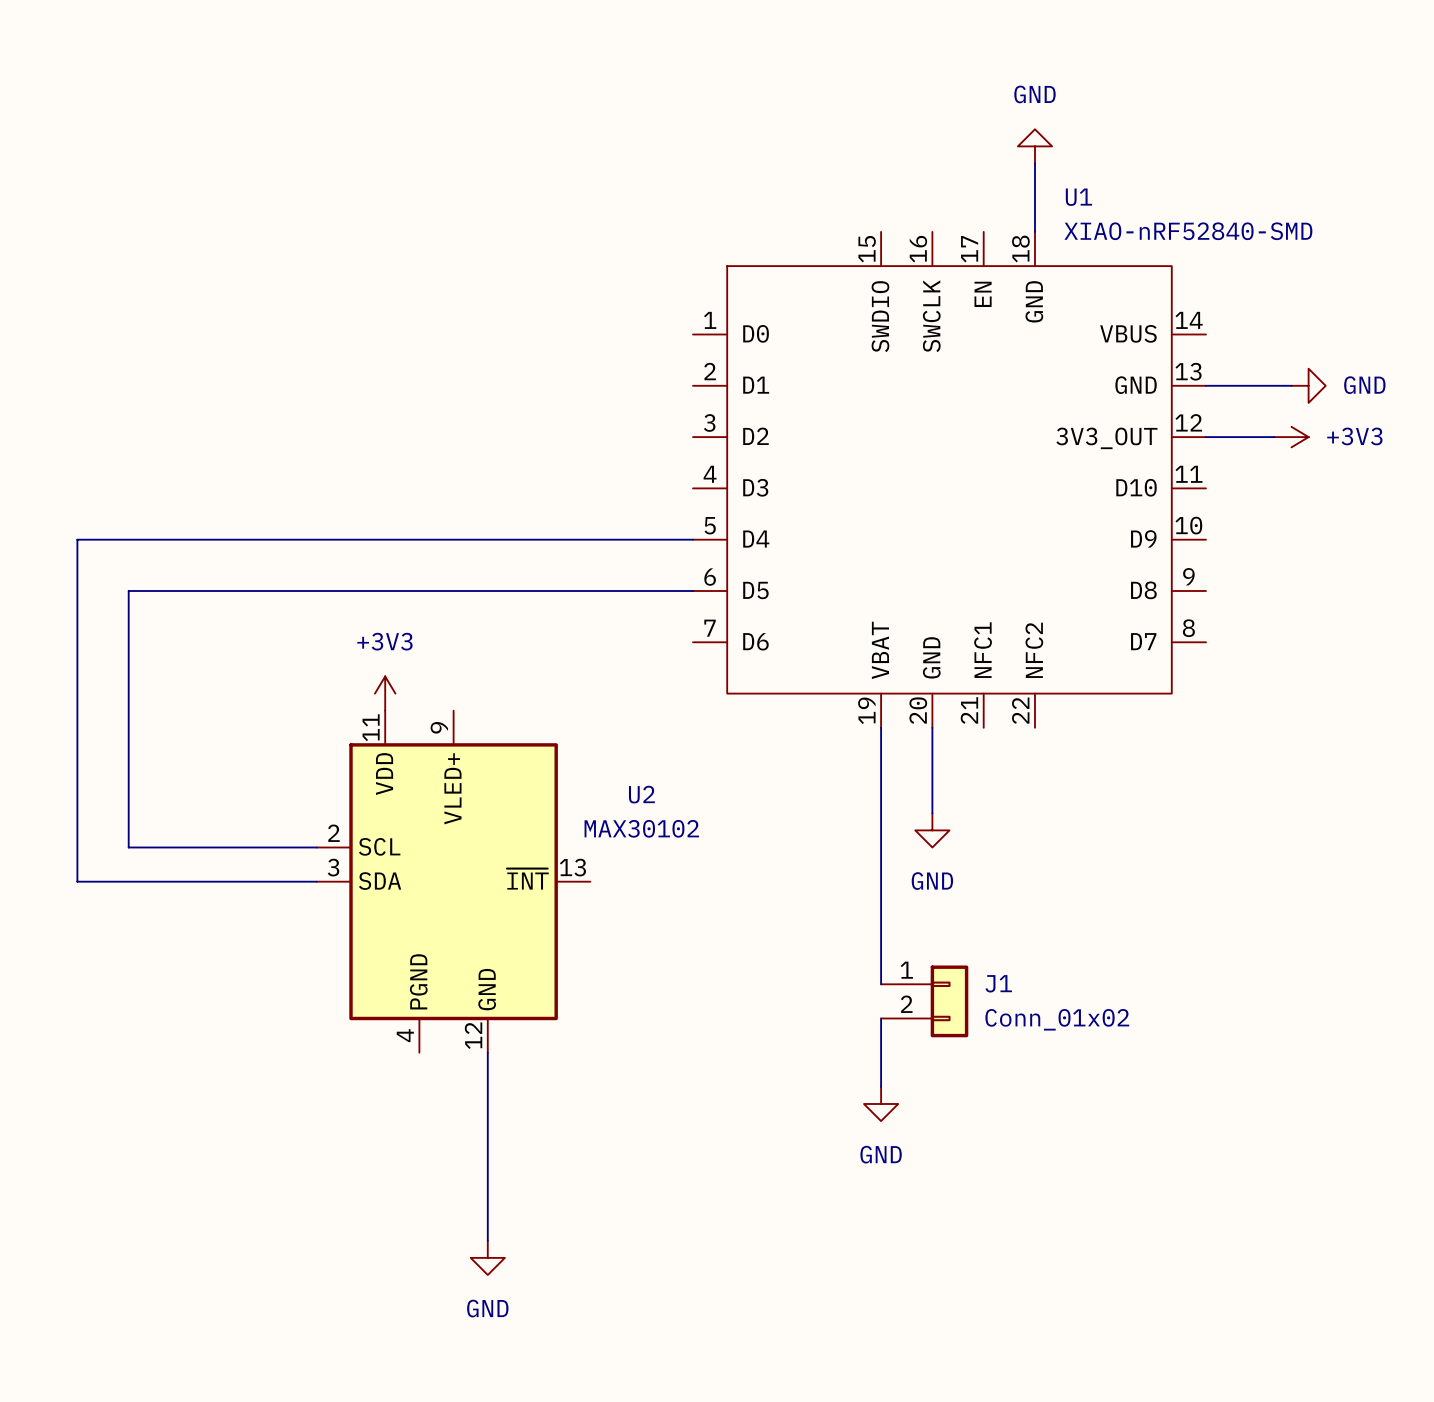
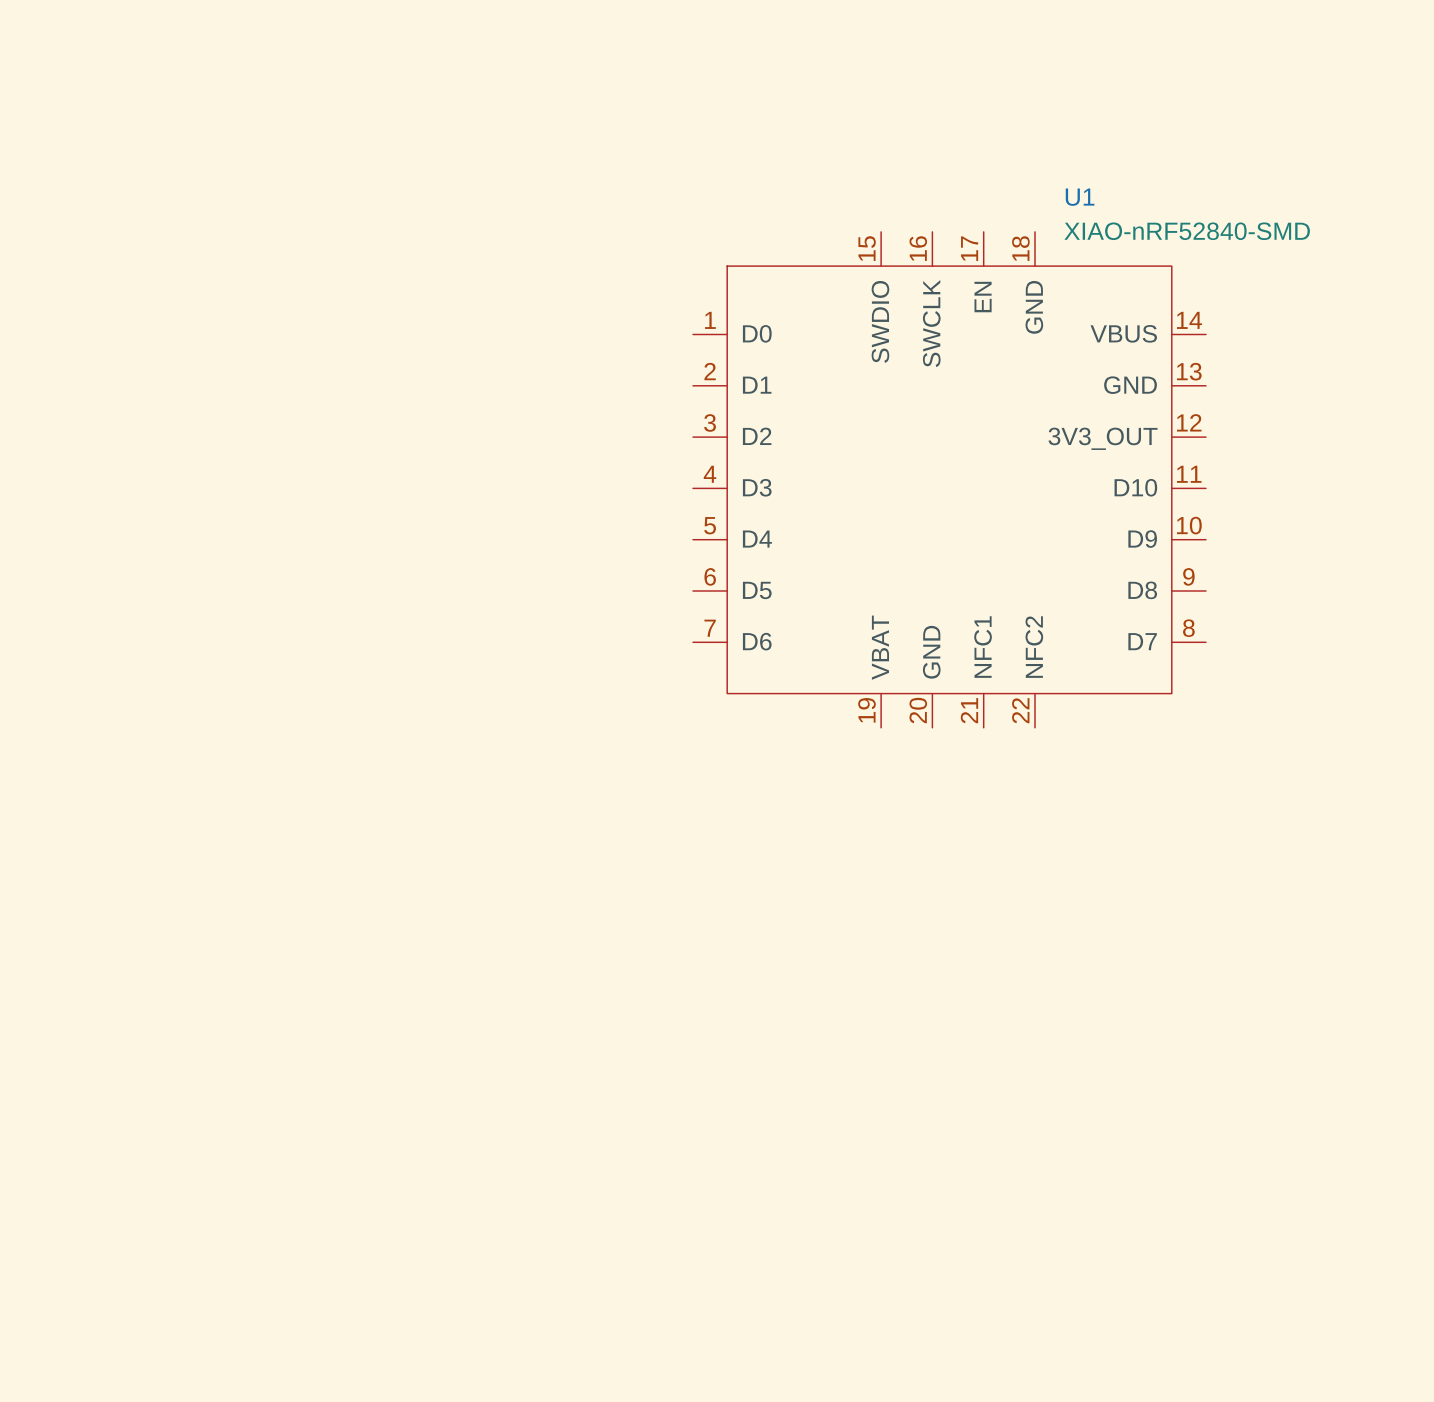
power symbol: GND (1034, 146) -> none
wire: (1034, 163) (1034, 231) -> none
wire: (1205, 385) (1291, 385) -> none
power symbol: GND (1308, 385) -> none
wire: (1205, 437) (1274, 437) -> none
power symbol: +3V3 (1291, 437) -> none
wire: (692, 539) (77, 539) (77, 881) (316, 881) -> none
wire: (692, 590) (128, 590) (128, 847) (316, 847) -> none
power symbol: +3V3 (385, 693) -> none
wire: (881, 727) (881, 984) -> none
wire: (932, 727) (932, 813) -> none
power symbol: GND (932, 830) -> none
U2: MAX30102 (453, 881) -> none
J1: Conn_01x02 (924, 1001) -> none
wire: (881, 1018) (881, 1086) -> none
wire: (487, 1052) (487, 1240) -> none
power symbol: GND (881, 1103) -> none
power symbol: GND (487, 1257) -> none

